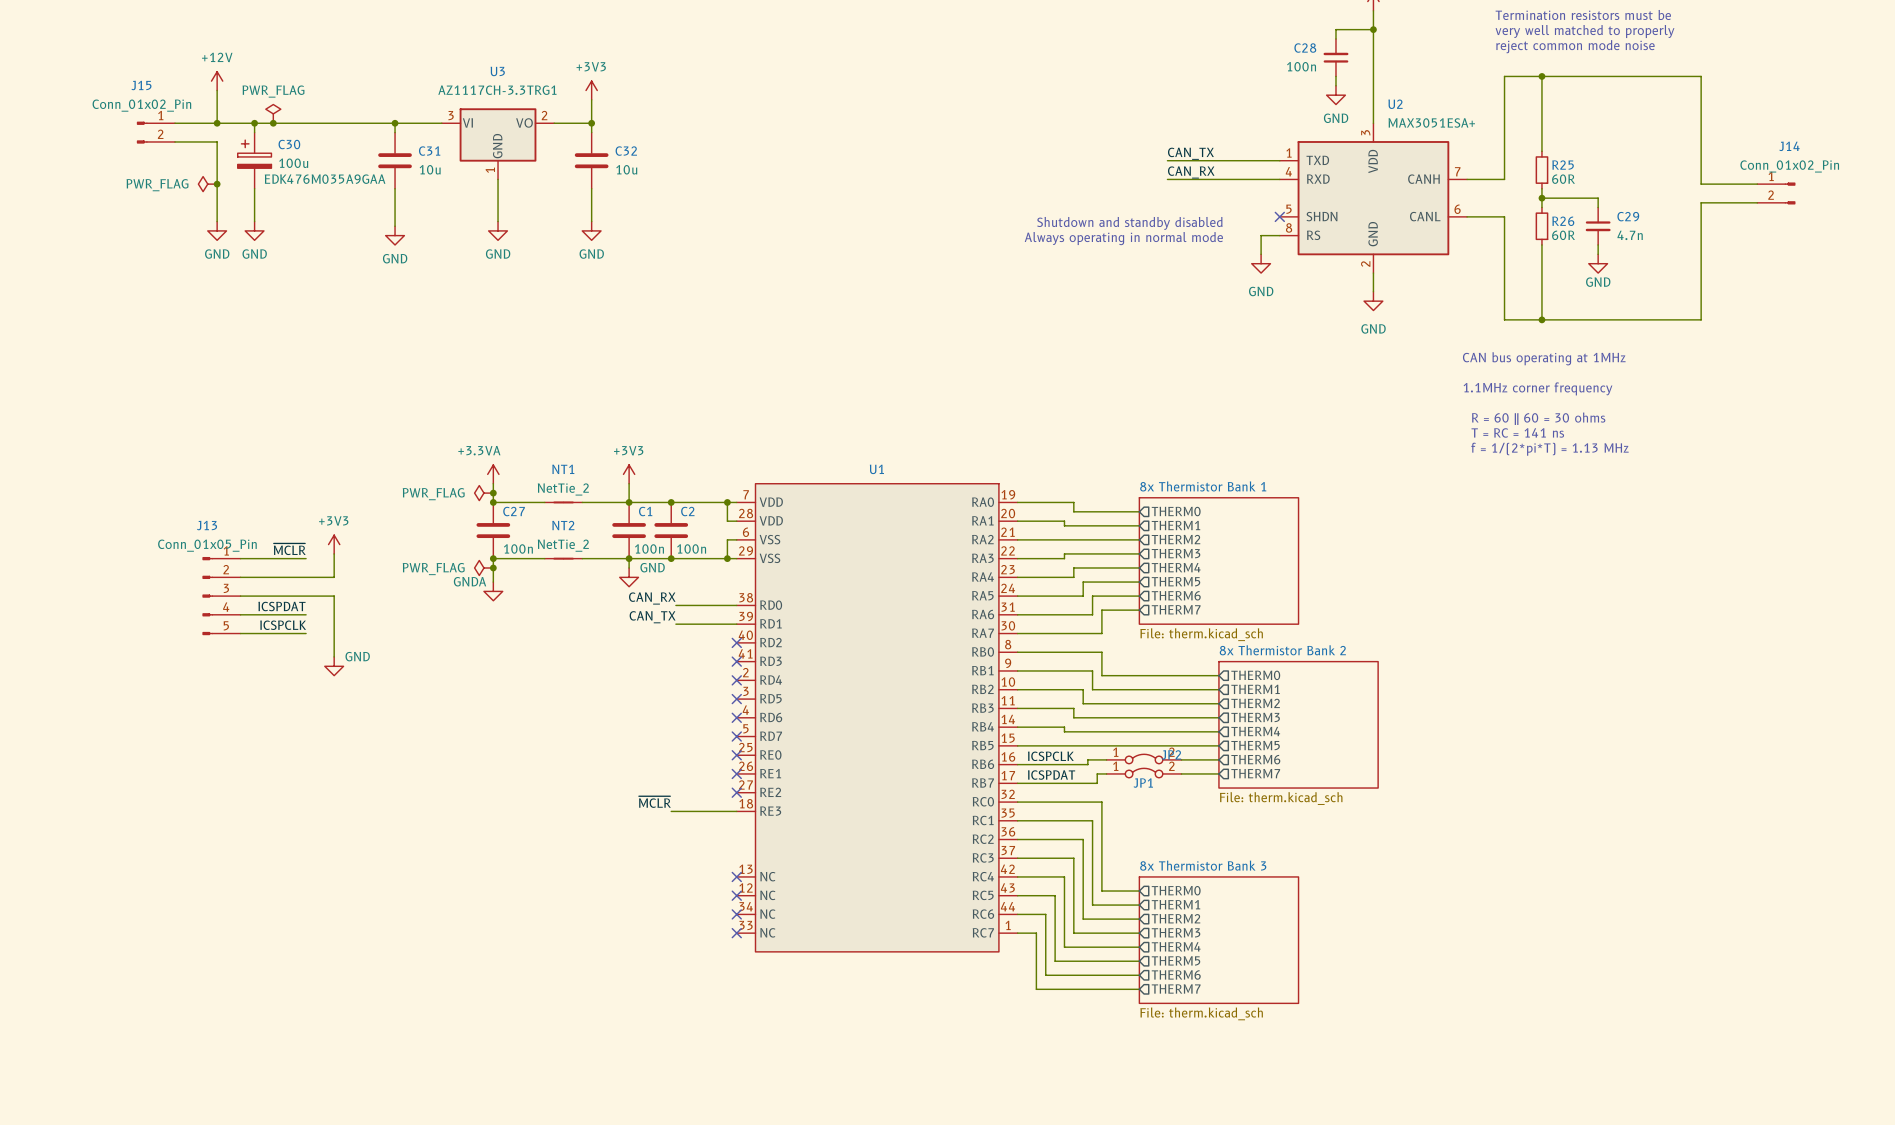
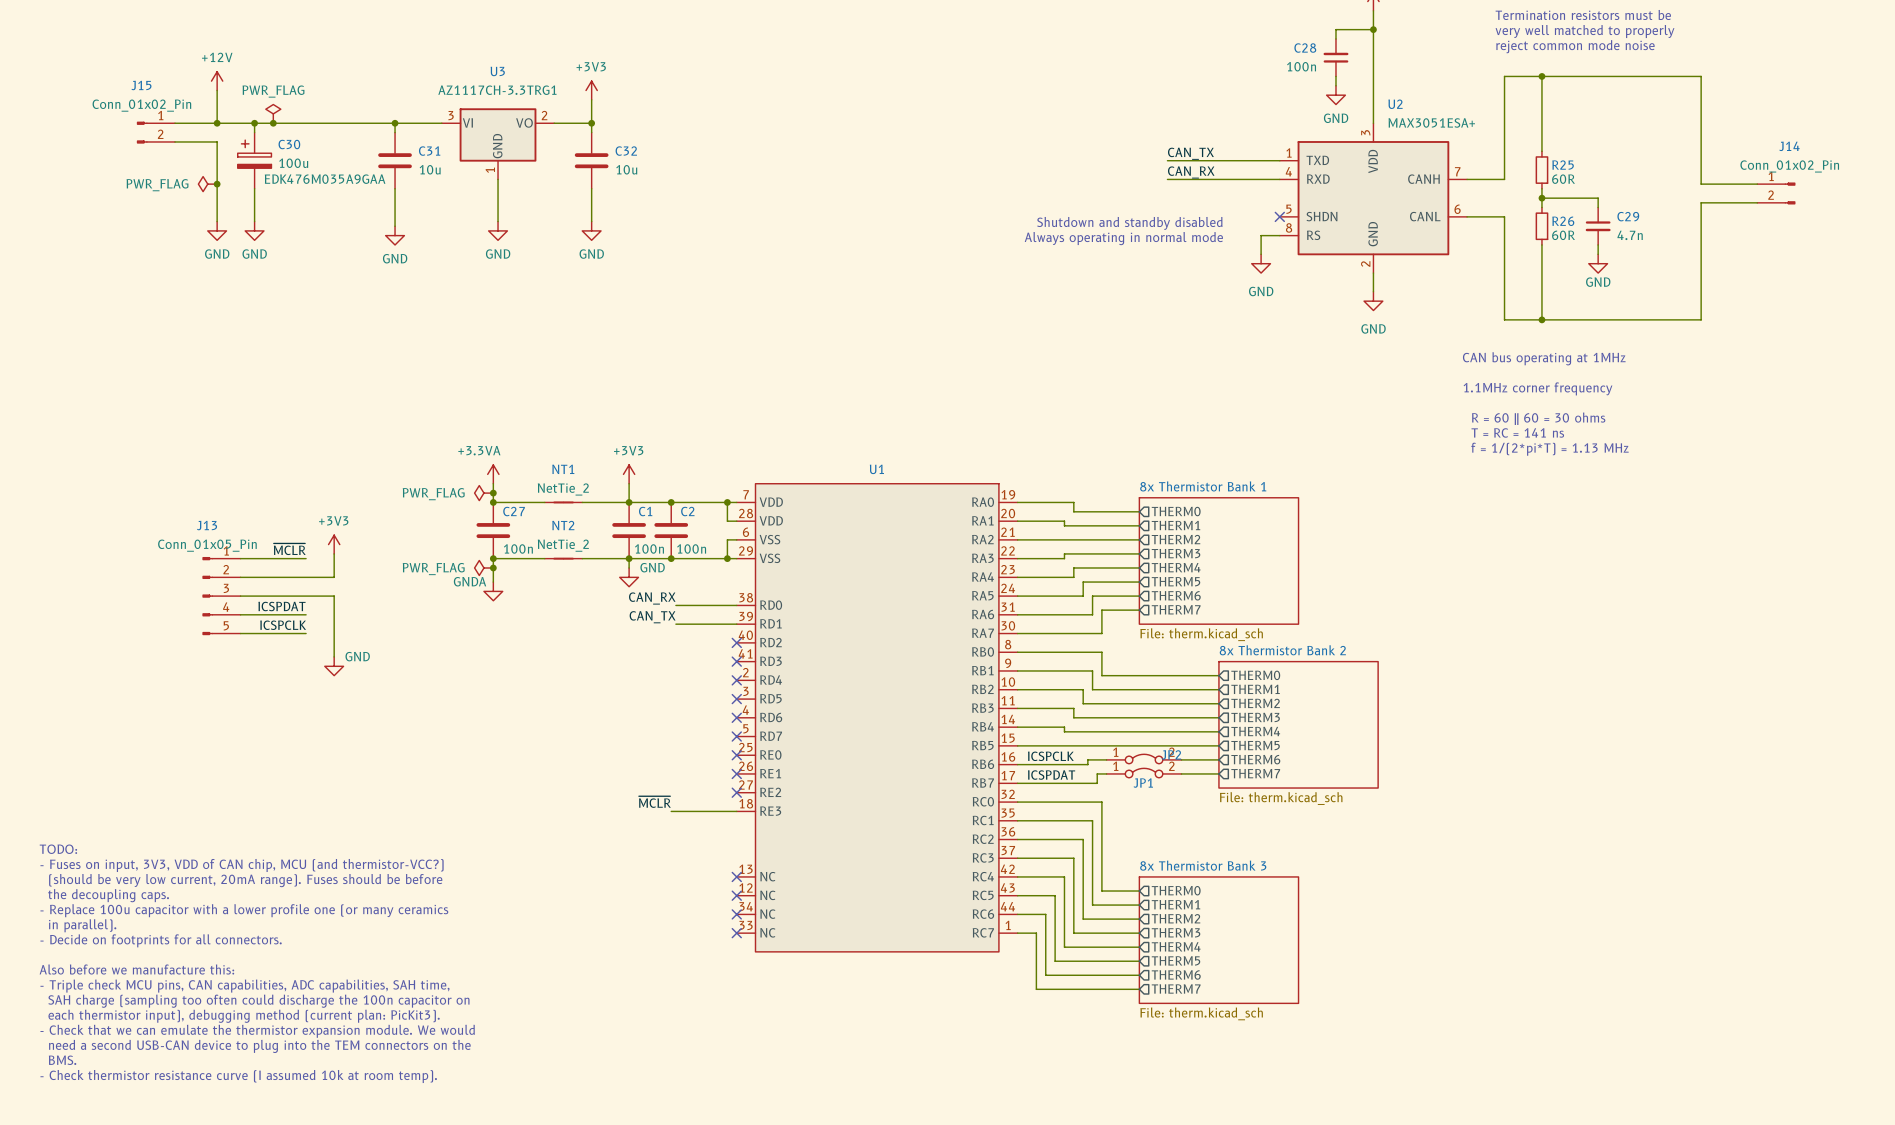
text: none -> TODO: (58, 849)
text: none -> - Fuses on input, 3V3, VDD of CAN chip, MCU (and thermistor-VCC?) (242, 865)
text: none -> (should be very low current, 20mA range). Fuses should be before (245, 880)
text: none -> the decoupling caps. (108, 895)
text: none -> - Replace 100u capacitor with a lower profile one (or many ceramics (244, 910)
text: none -> in parallel). (82, 925)
text: none -> - Decide on footprints for all connectors. (161, 940)
text: none -> Also before we manufacture this: (136, 969)
text: none -> - Triple check MCU pins, CAN capabilities, ADC capabilities, SAH time, (244, 986)
text: none -> SAH charge (sampling too often could discharge the 100n capacitor on (258, 1001)
text: none -> each thermistor input), debugging method (current plan: PicKit3). (244, 1016)
text: none -> - Check that we can emulate the thermistor expansion module. We would (257, 1031)
text: none -> need a second USB-CAN device to plug into the TEM connectors on the (259, 1046)
text: none -> BMS. (62, 1060)
text: none -> - Check thermistor resistance curve (I assumed 10k at room temp). (238, 1076)

